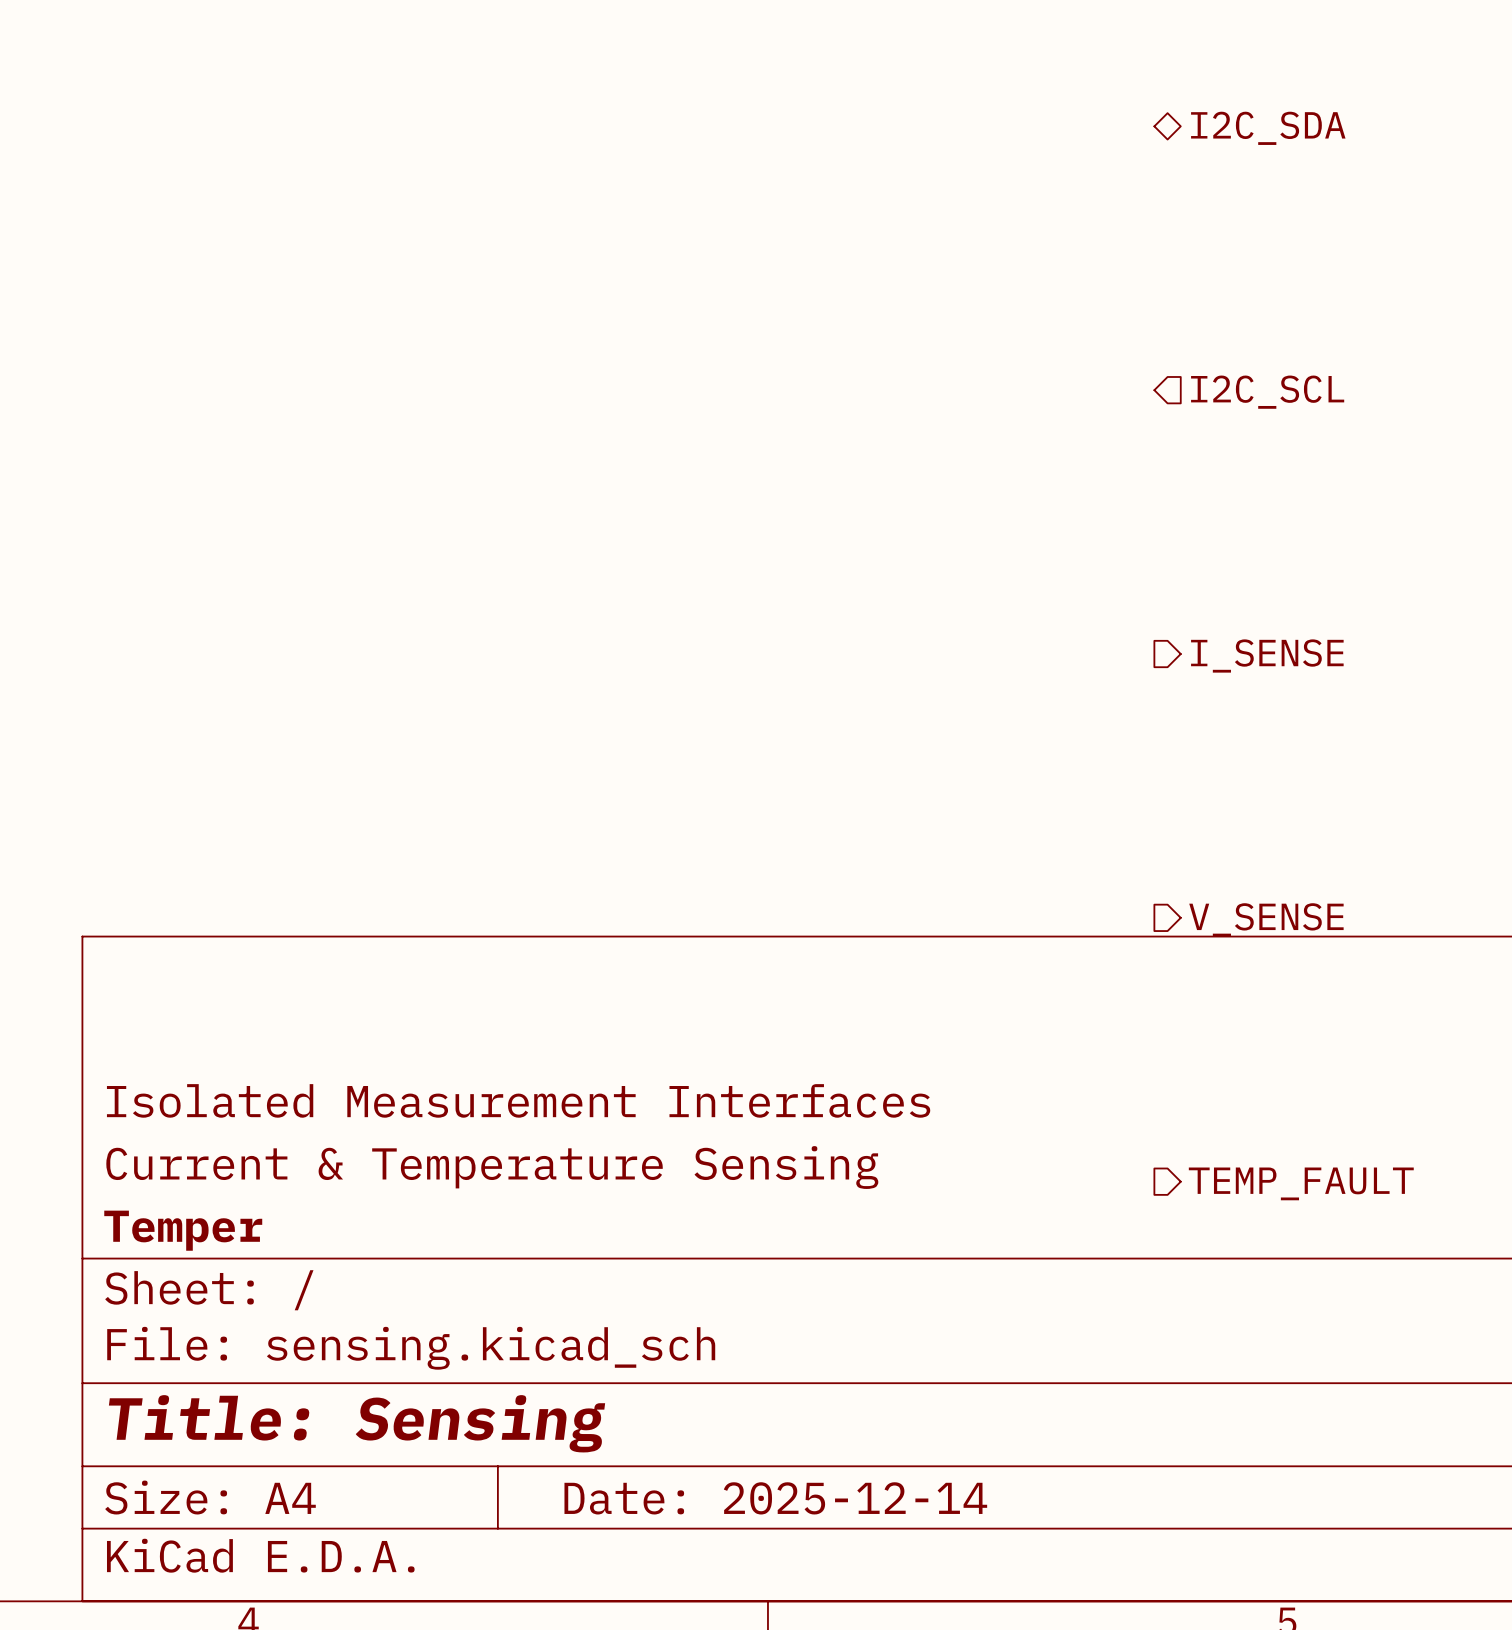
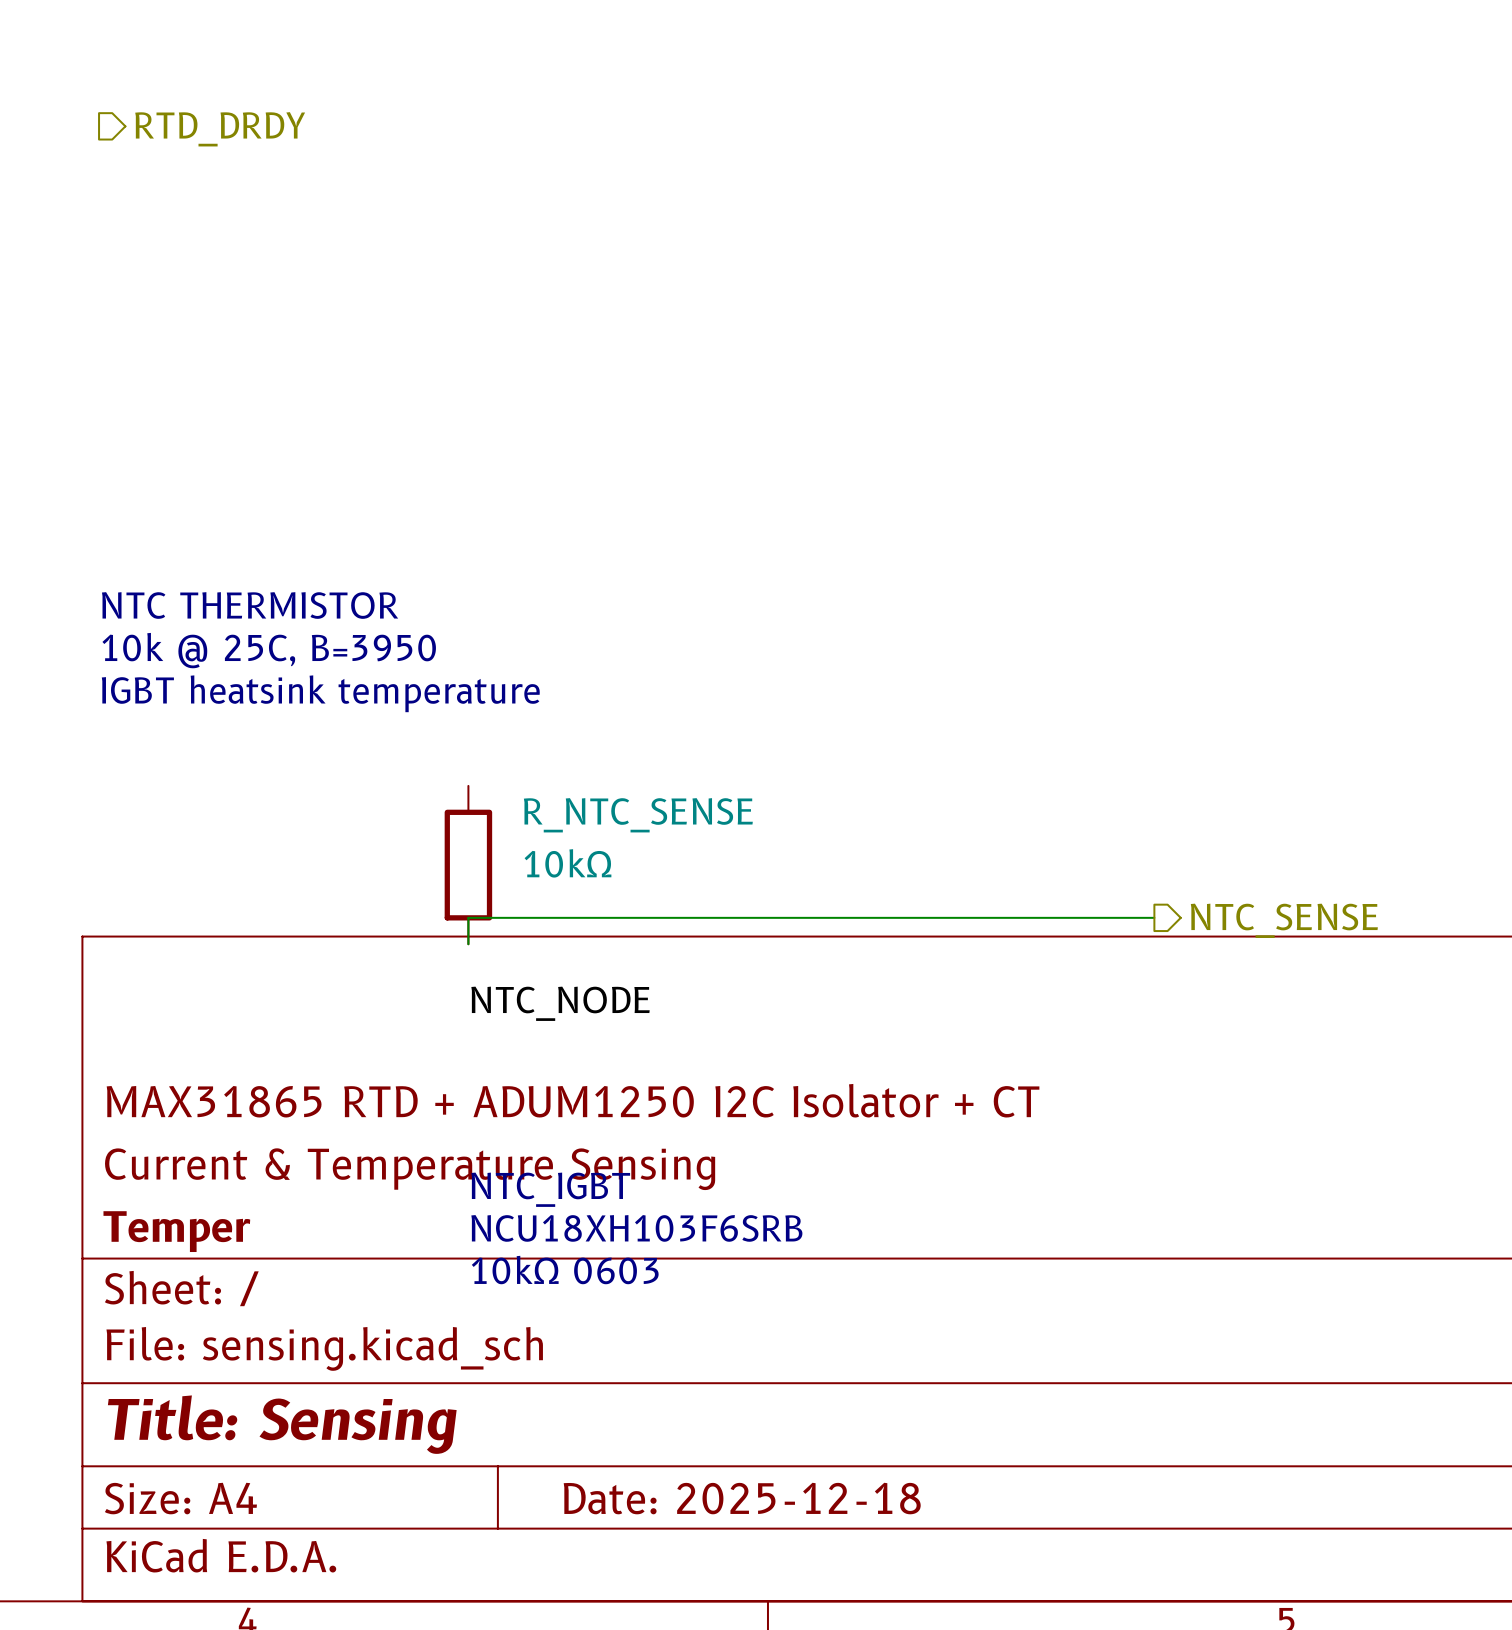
hierarchical label: none -> RTD_DRDY (220, 129)
hierarchical label: I2C_SDA (1268, 128) -> none
hierarchical label: I2C_SCL (1267, 392) -> none
text: none -> NTC THERMISTOR (250, 605)
text: none -> 10k @ 25C, B=3950 (269, 650)
hierarchical label: I_SENSE (1267, 656) -> none
text: none -> IGBT heatsink temperature (320, 693)
R_NTC_SENSE: none -> 10kΩ (468, 865)
wire: none -> (1154, 917) (468, 917) (468, 944)
hierarchical label: V_SENSE (1266, 919) -> NTC_SENSE (1284, 920)
label: none -> NTC_NODE (560, 1003)
title block: Isolated Measurement Interfaces (518, 1100) -> MAX31865 RTD + ADUM1250 I2C Isolator + CT (573, 1100)
hierarchical label: TEMP_FAULT (1301, 1183) -> none
text: none -> NTC_IGBT (550, 1189)
text: none -> NCU18XH103F6SRB (636, 1228)
text: none -> 10kΩ 0603 (565, 1270)
title block: Date: 2025-12-14 (775, 1498) -> Date: 2025-12-18 (742, 1498)

